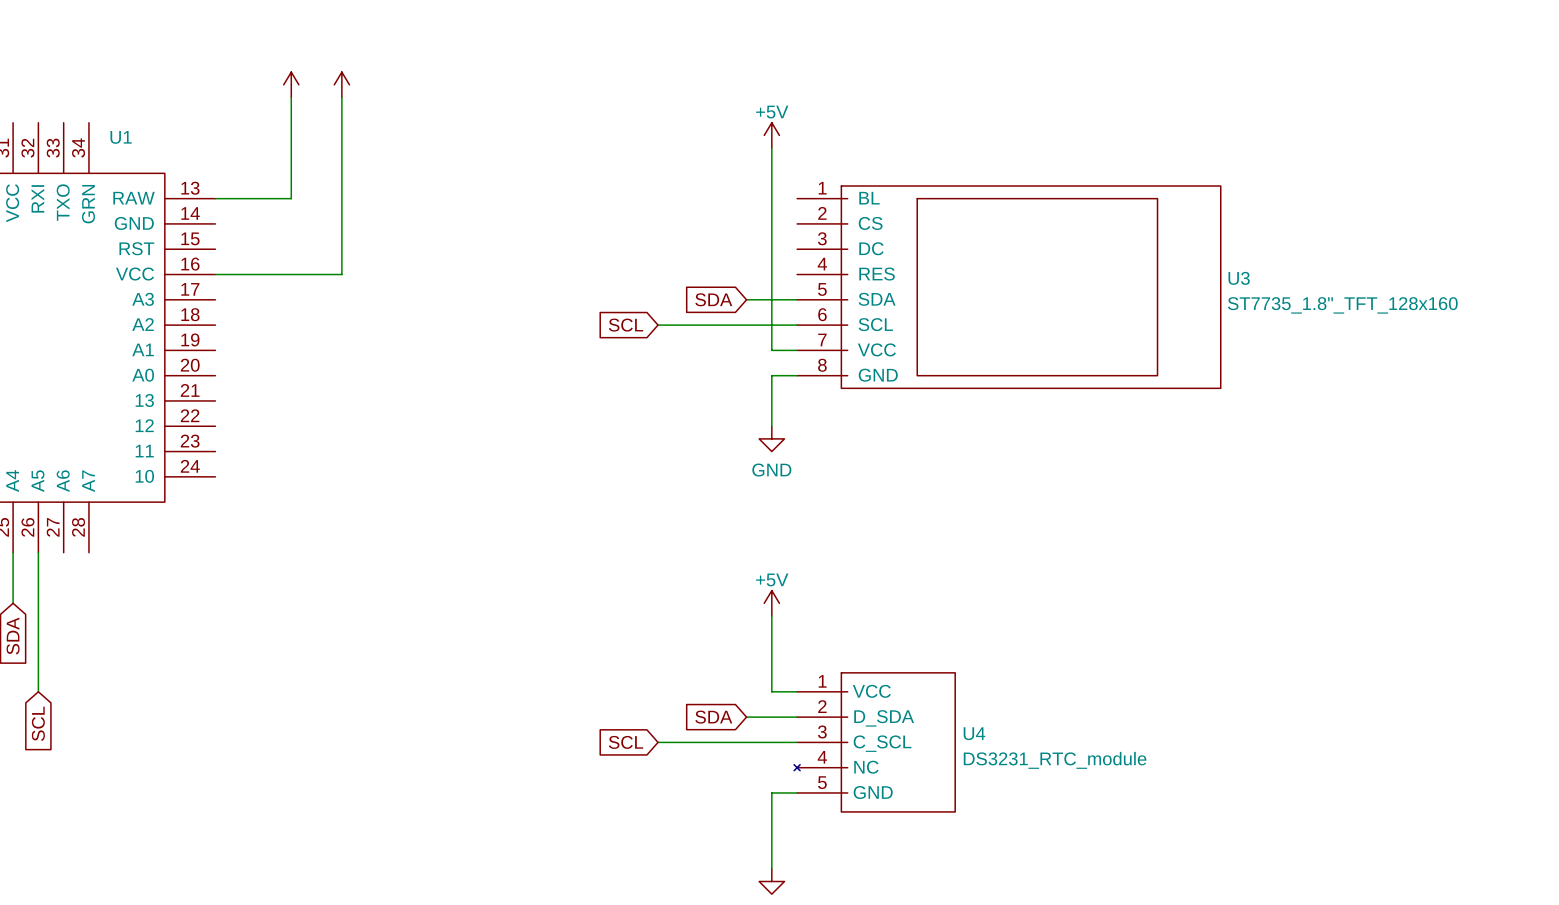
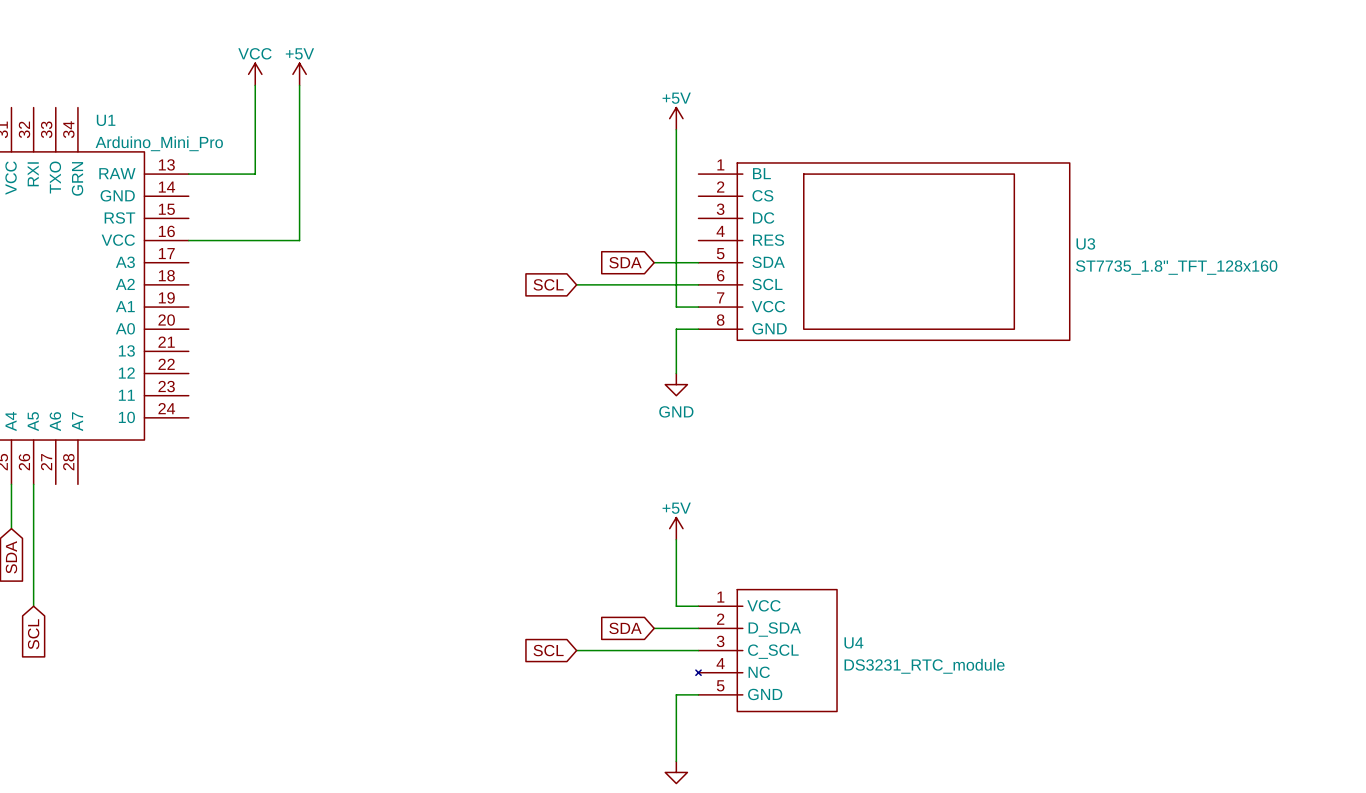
power symbol text: none -> VCC (254, 53)
power symbol text: none -> +5V (299, 53)
U1 value: none -> Arduino_Mini_Pro (159, 143)

